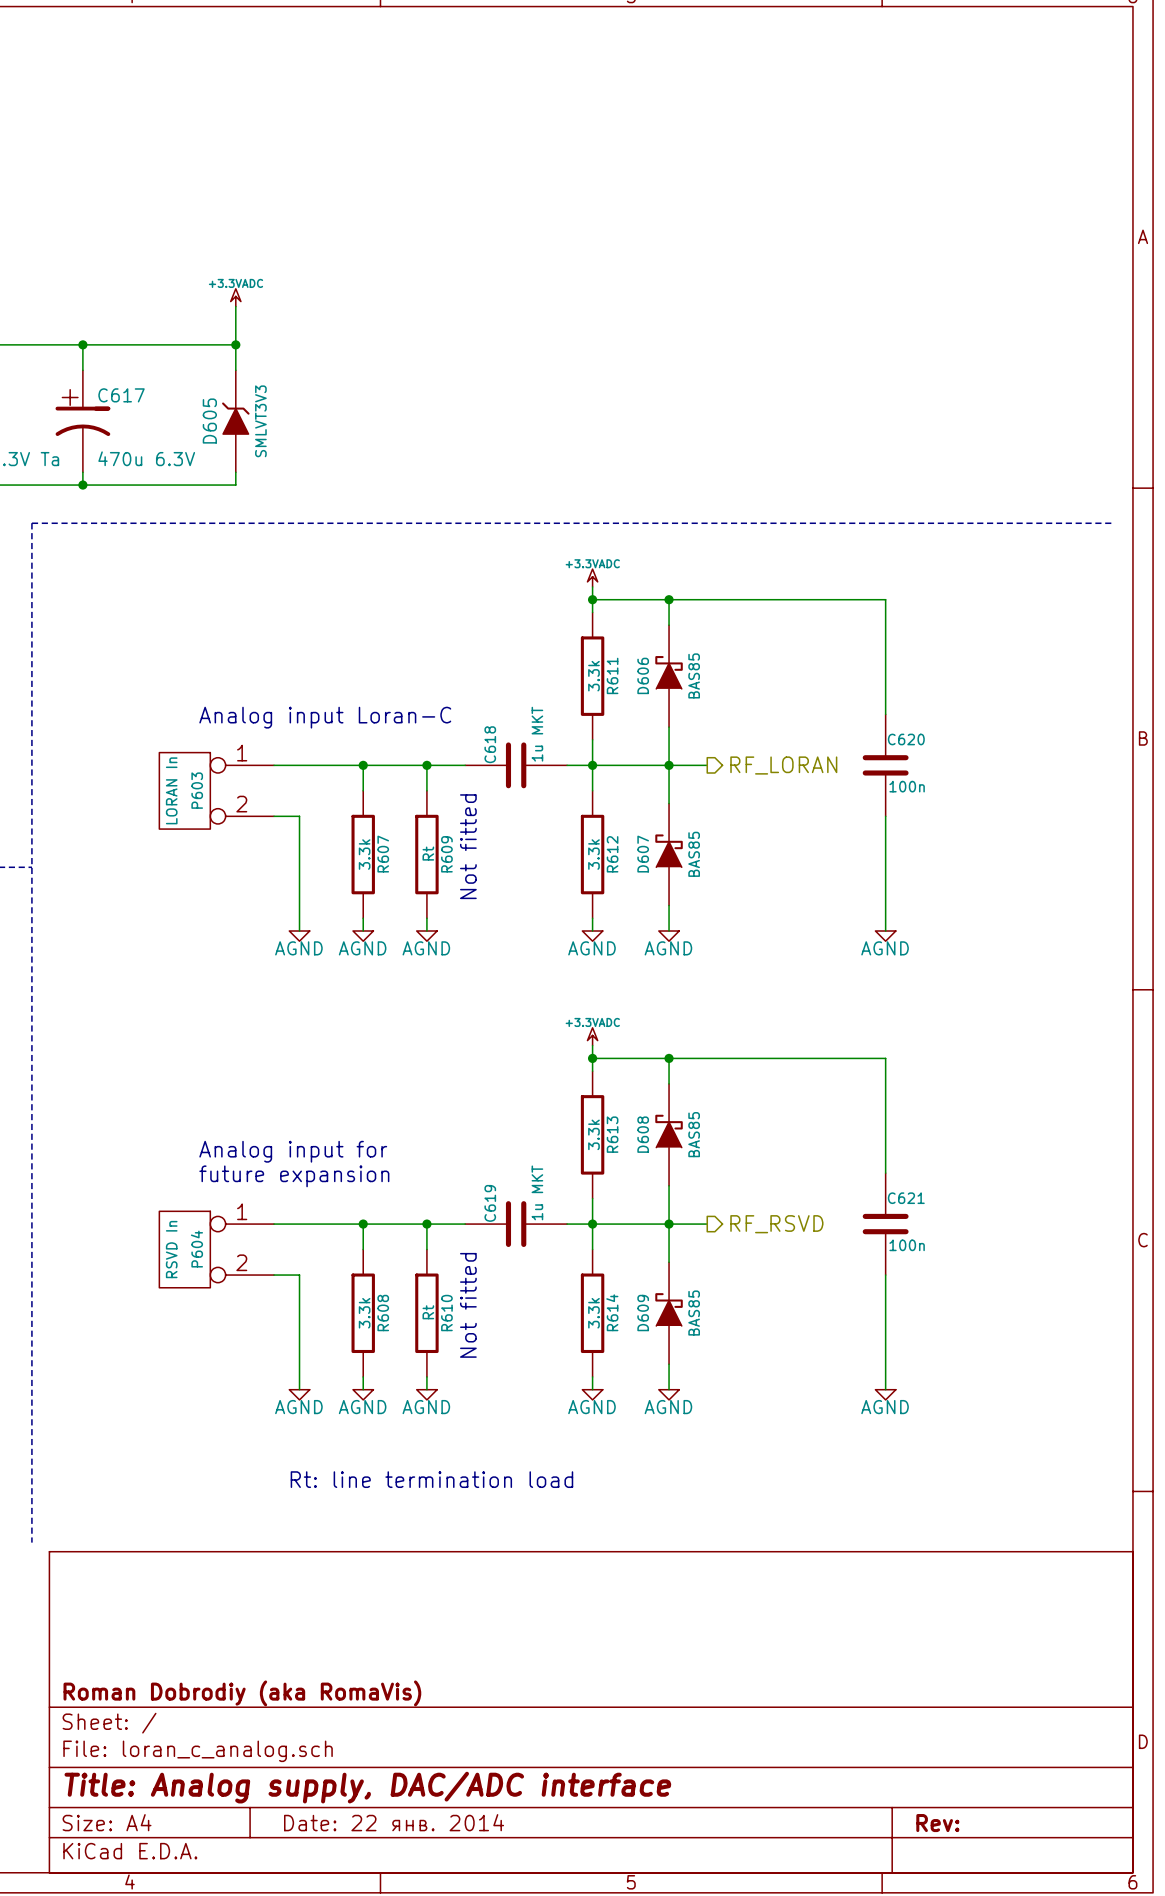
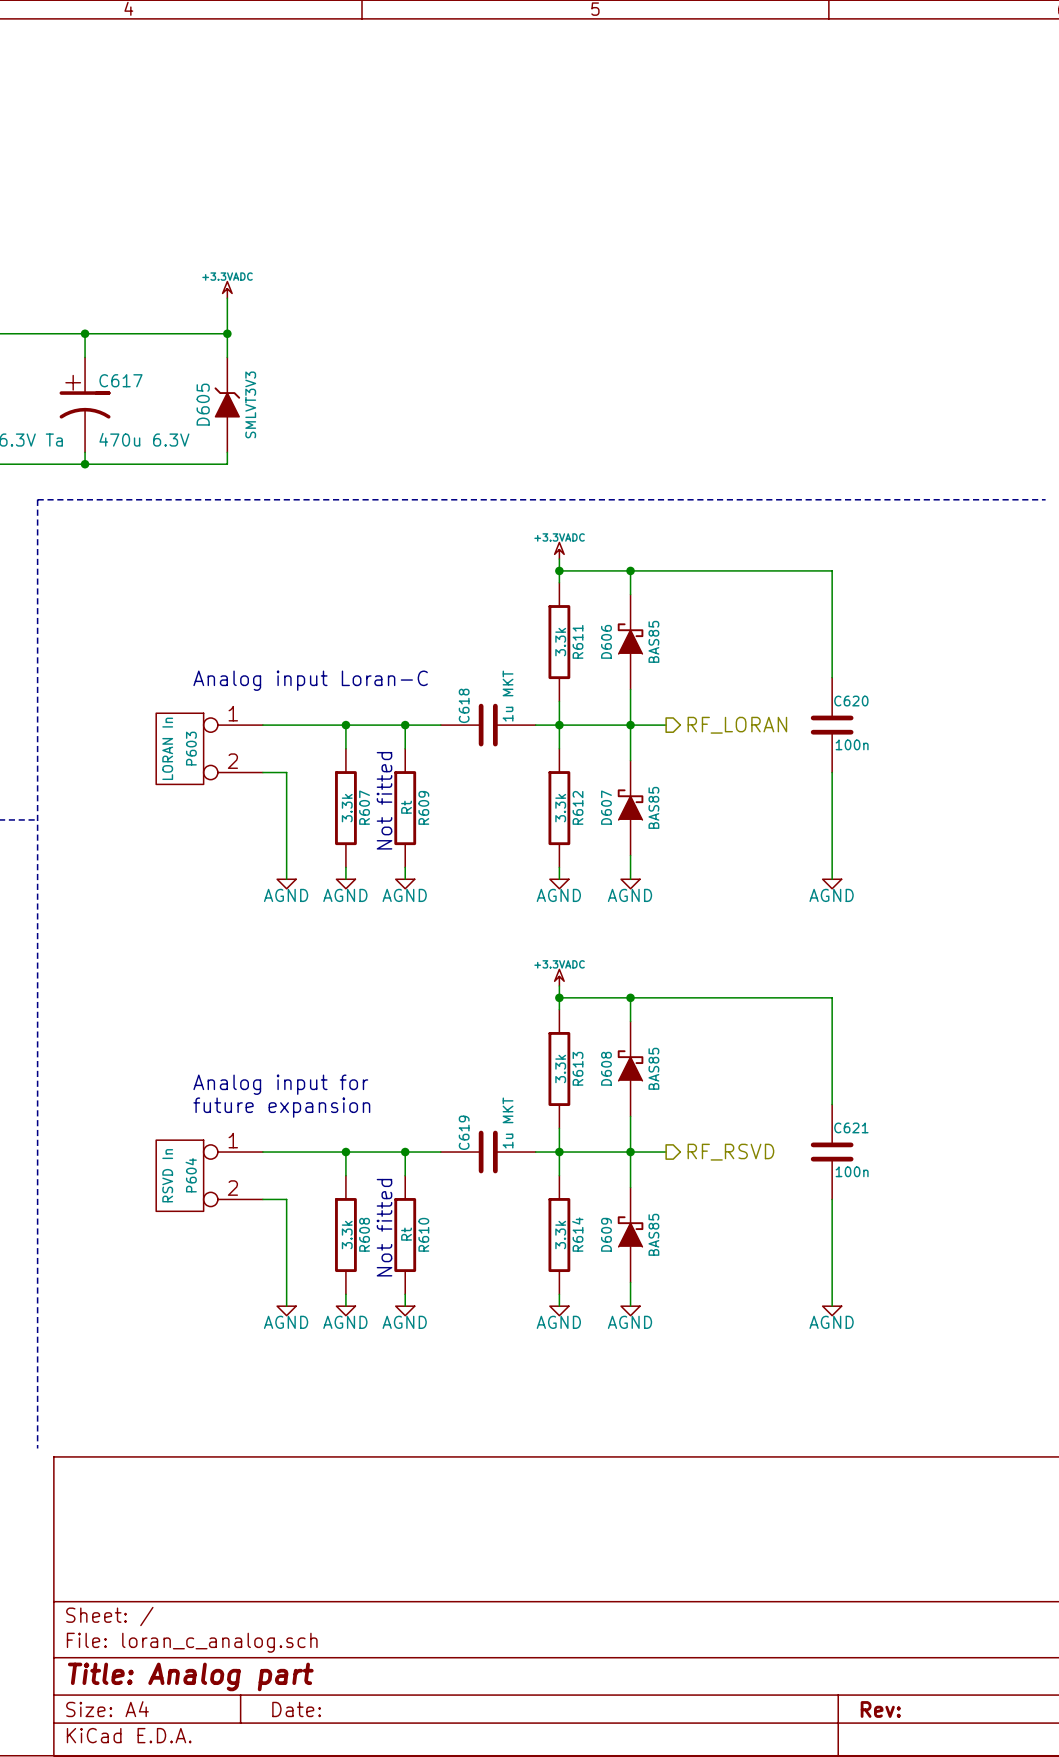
text position: Not fitted (468, 846) -> Not fitted (384, 800)
text position: Not fitted (468, 1305) -> Not fitted (384, 1227)
text: Rt: line termination load (431, 1479) -> none
title block: Roman Dobrodiy (aka RomaVis) (242, 1693) -> none
title block: Title: Analog supply, DAC/ADC interface (367, 1787) -> Title: Analog part (190, 1676)
title block: Date: 22 янв. 2014 (394, 1822) -> Date: (296, 1709)

